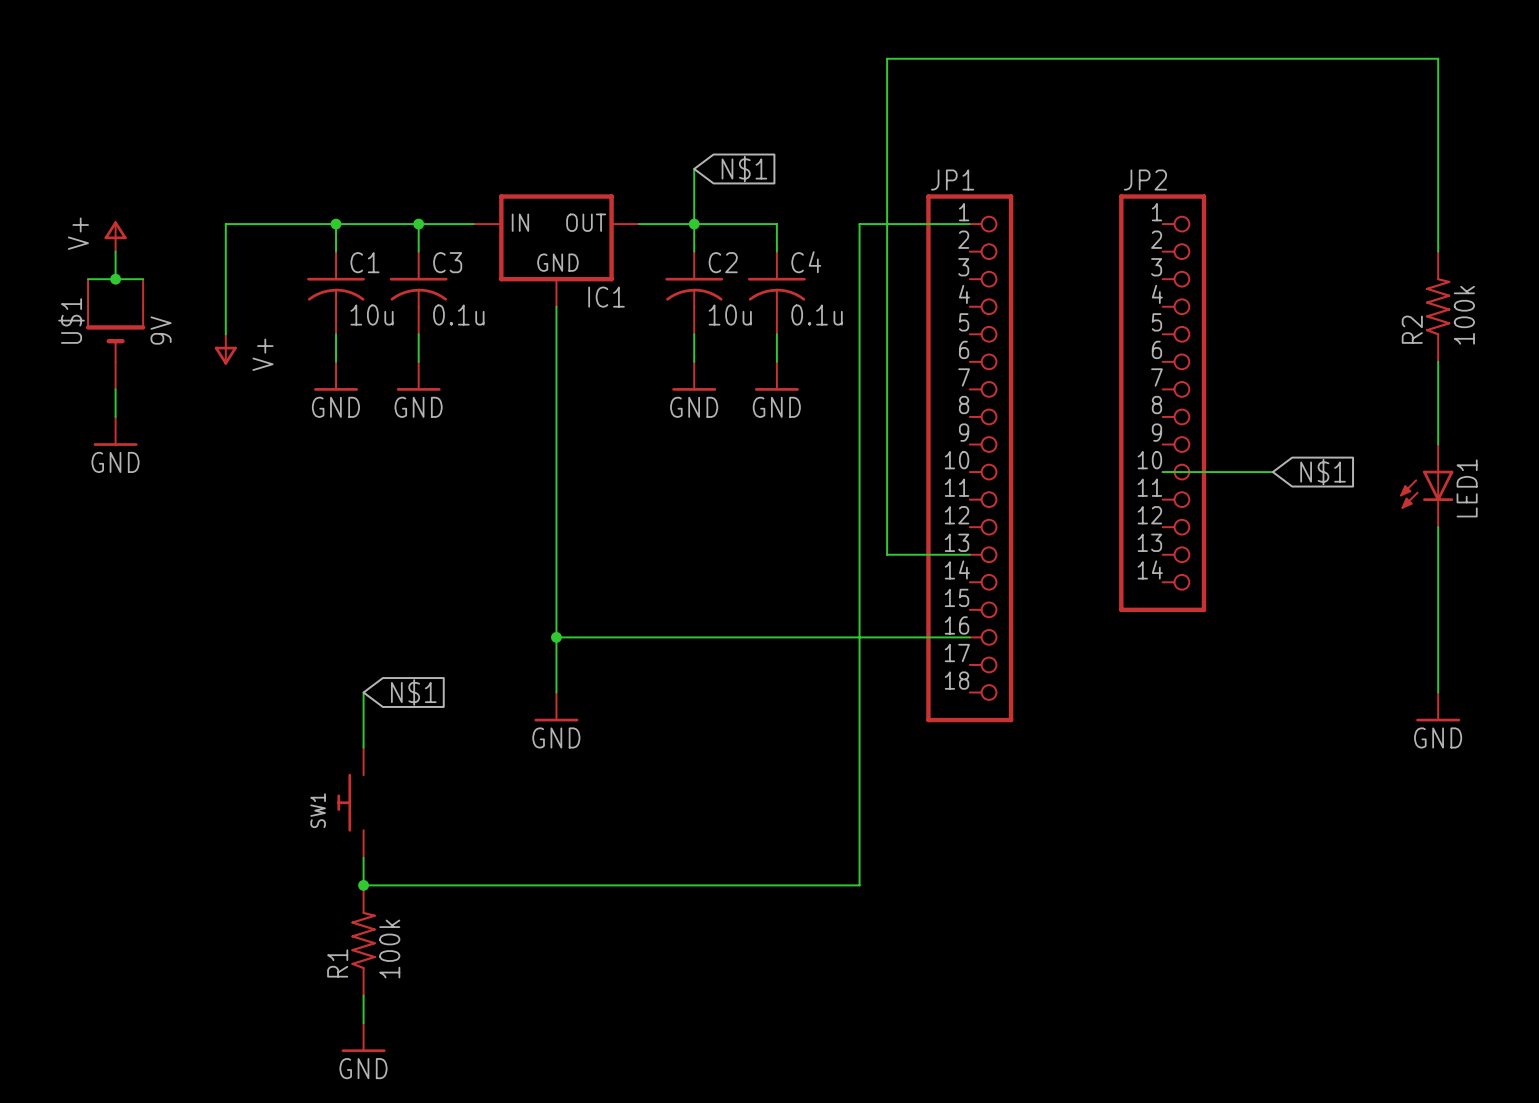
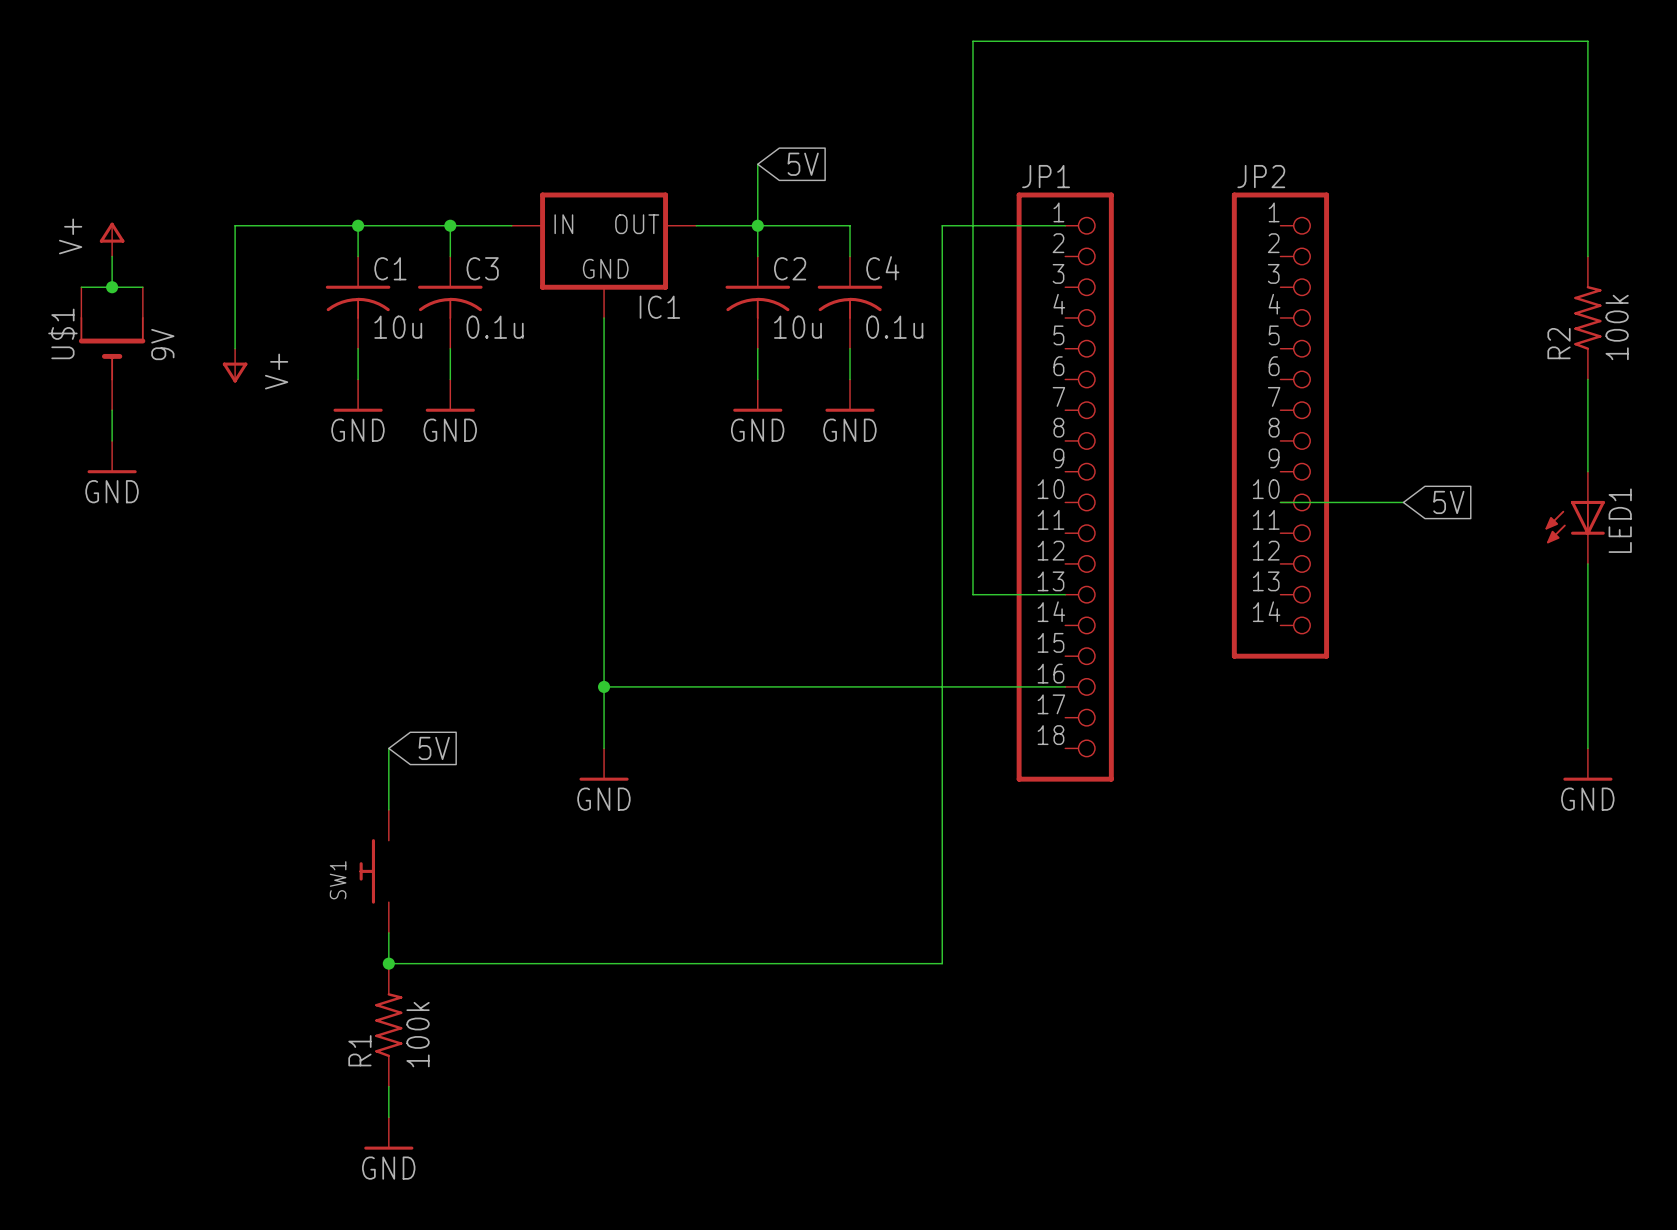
global label: N$1 (744, 168) -> 5V (803, 164)
global label: N$1 (1323, 472) -> 5V (1448, 502)
global label: N$1 (413, 692) -> 5V (434, 748)

